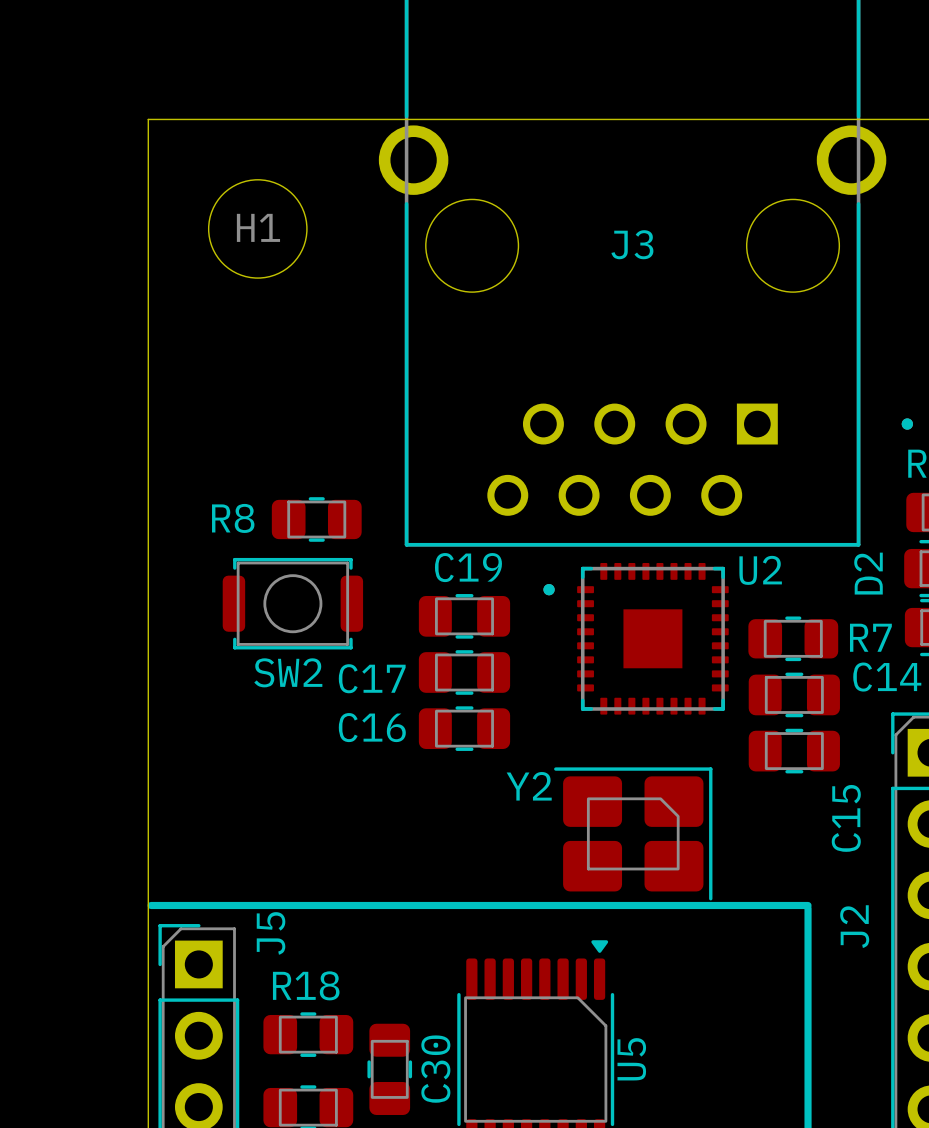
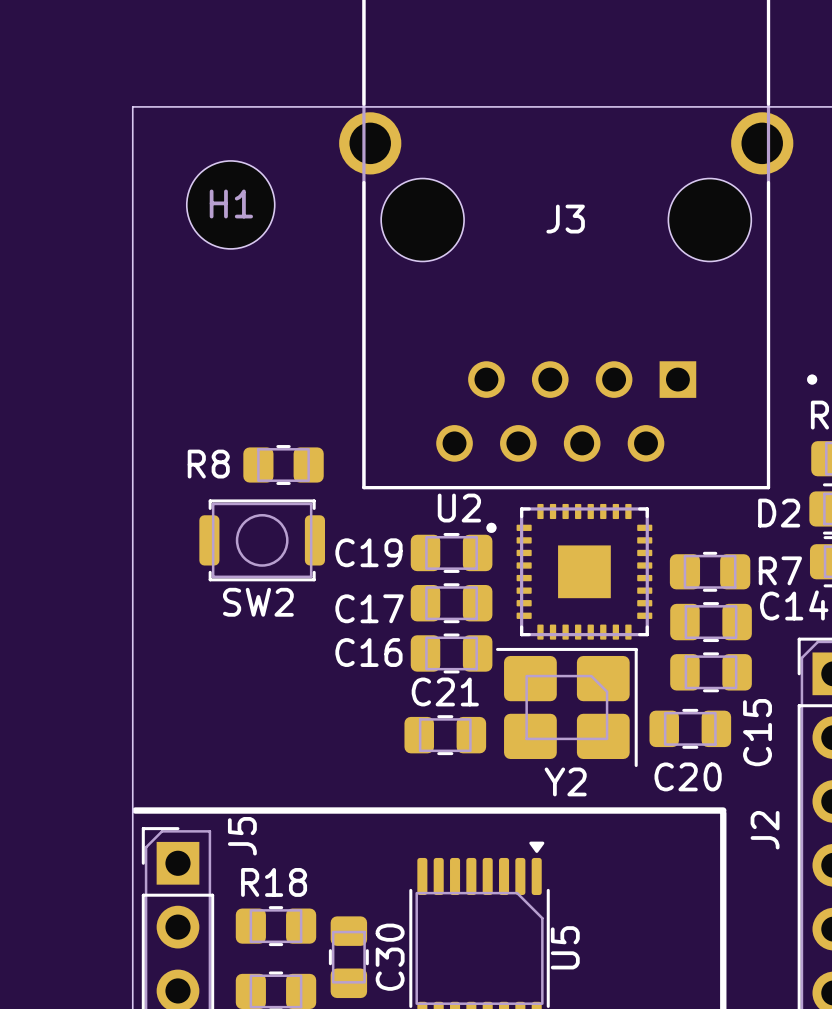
C19 name position: C19 (468, 567) -> C19 (368, 552)
U2 name position: U2 (760, 570) -> U2 (459, 508)
D2 name rotation: 0° (868, 573) -> 90° clockwise (779, 513)
C19 position: (464, 616) -> (451, 552)
C17 position: (464, 672) -> (451, 603)
C16 position: (464, 728) -> (451, 653)
Y2 name position: Y2 (529, 786) -> Y2 (565, 781)
C20: none -> (690, 728)
C21: none -> (445, 735)
Y2 position: (633, 833) -> (566, 707)

